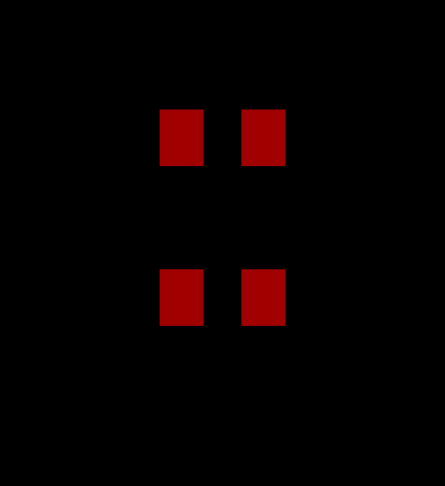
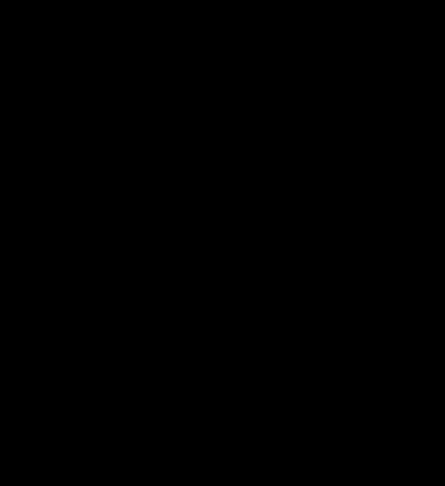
part: (222, 137) -> none
part: (222, 297) -> none

